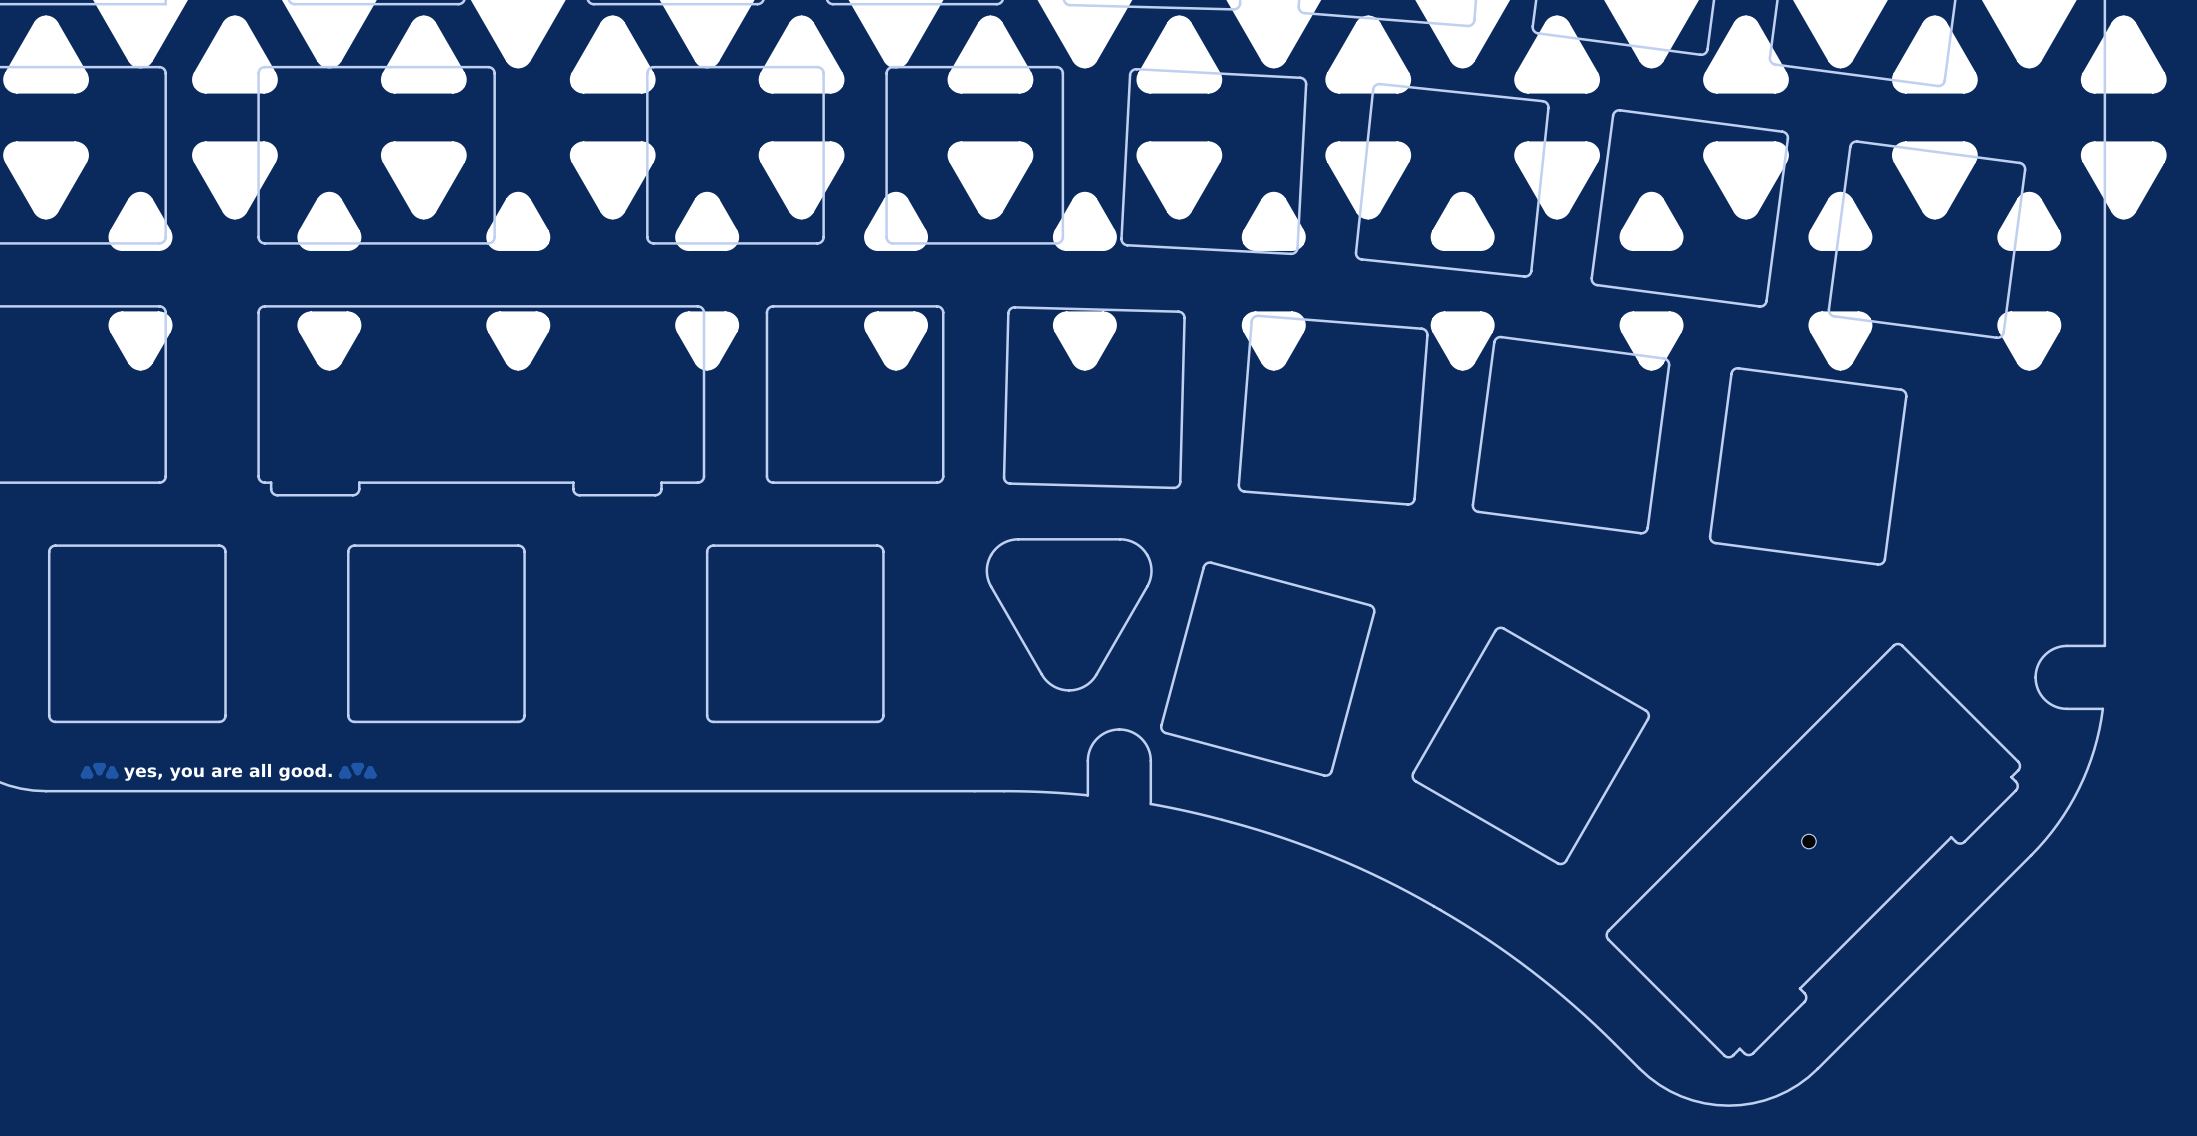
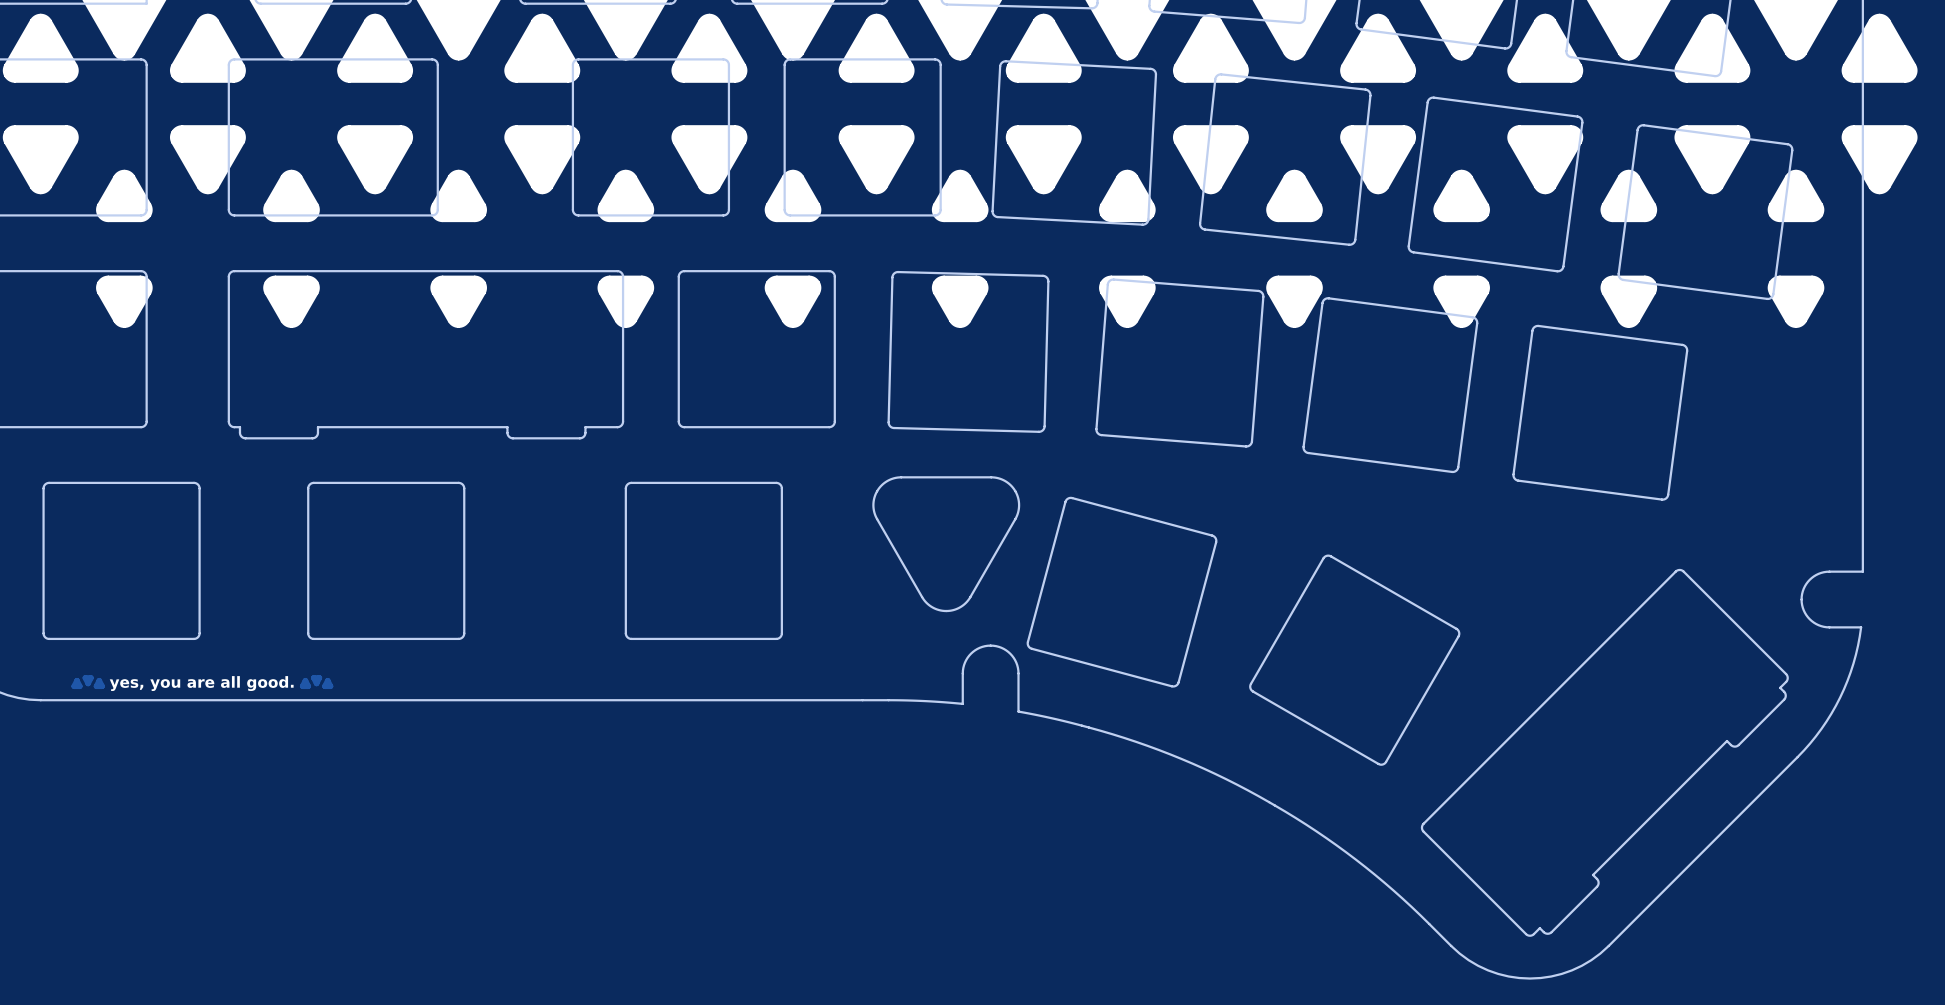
part: (1808, 841) -> none

